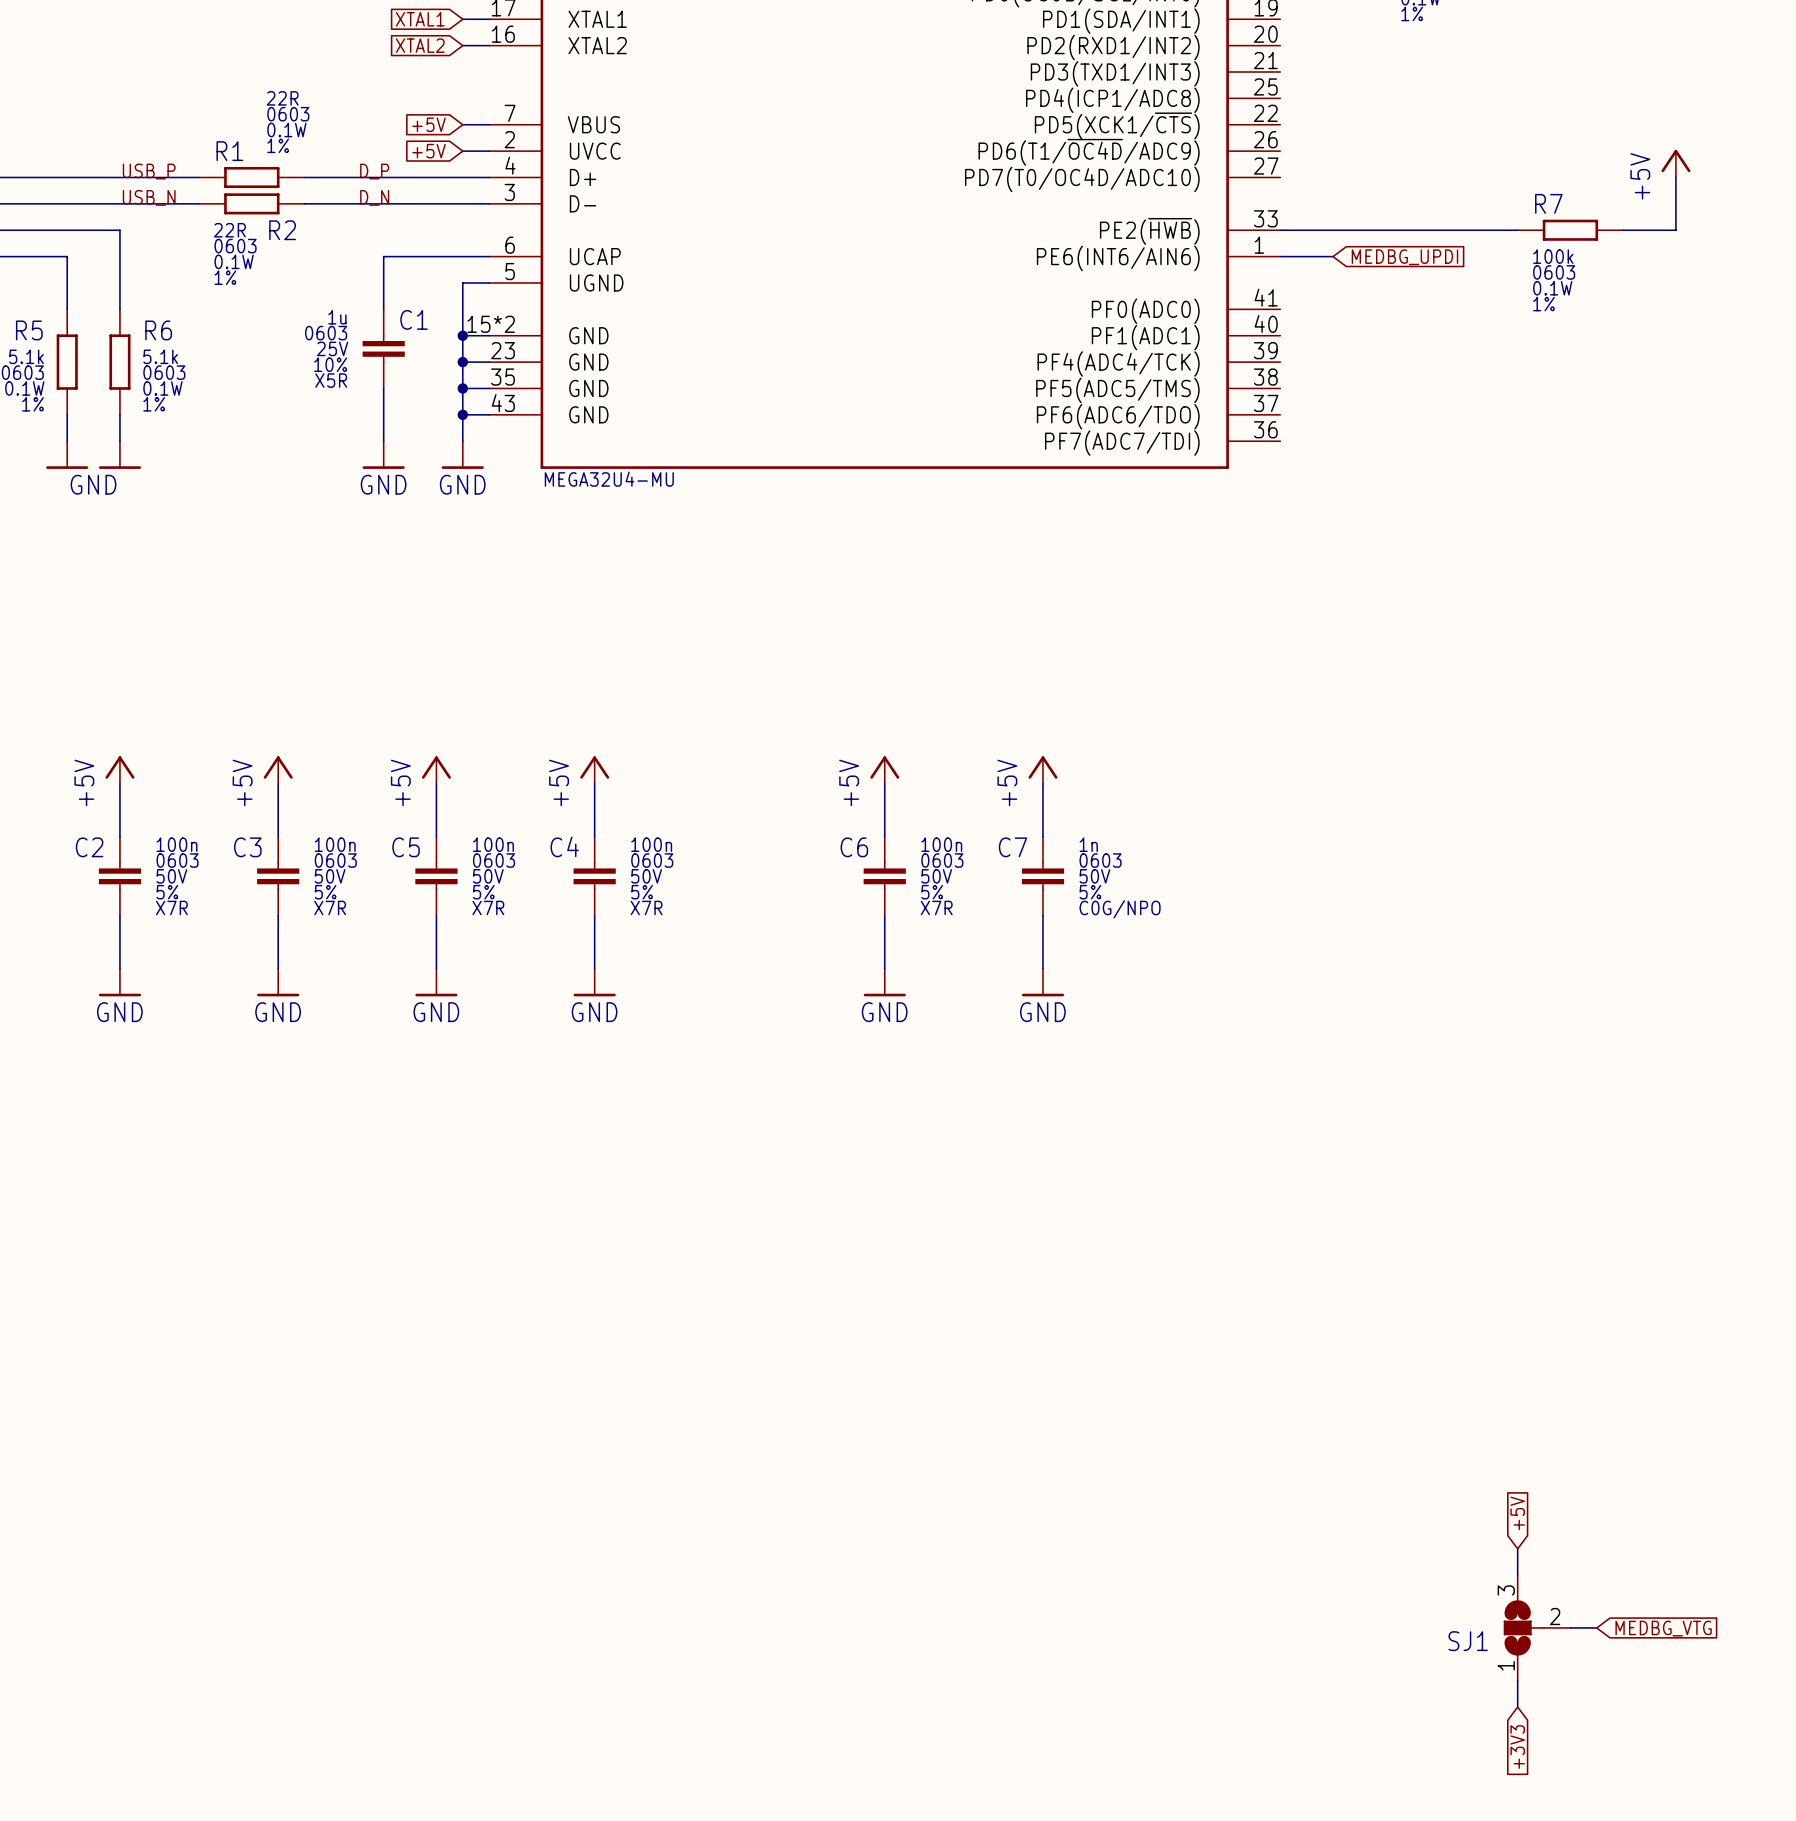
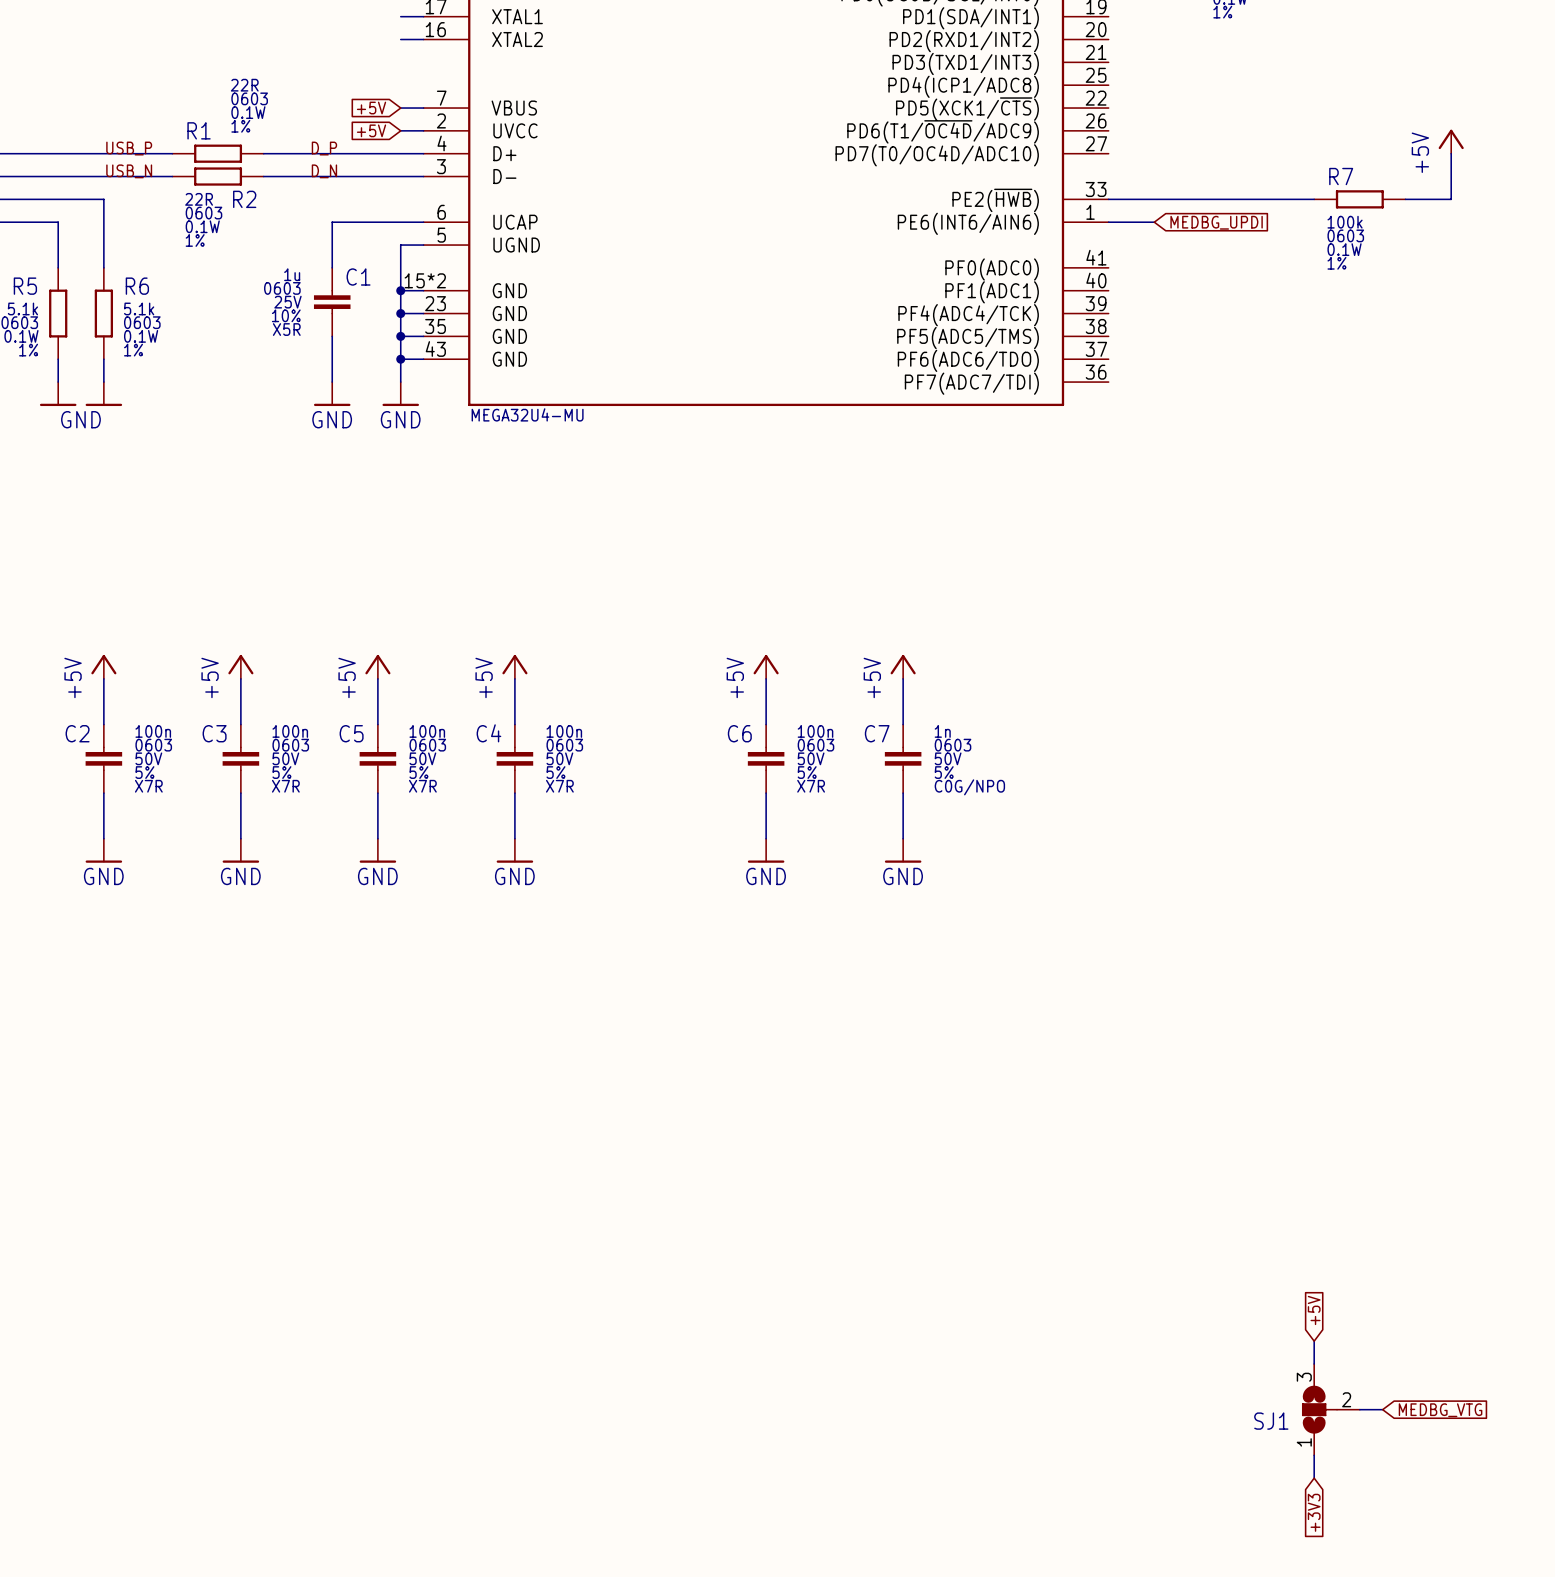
global label: XTAL1 (420, 19) -> none
global label: XTAL2 (420, 45) -> none

